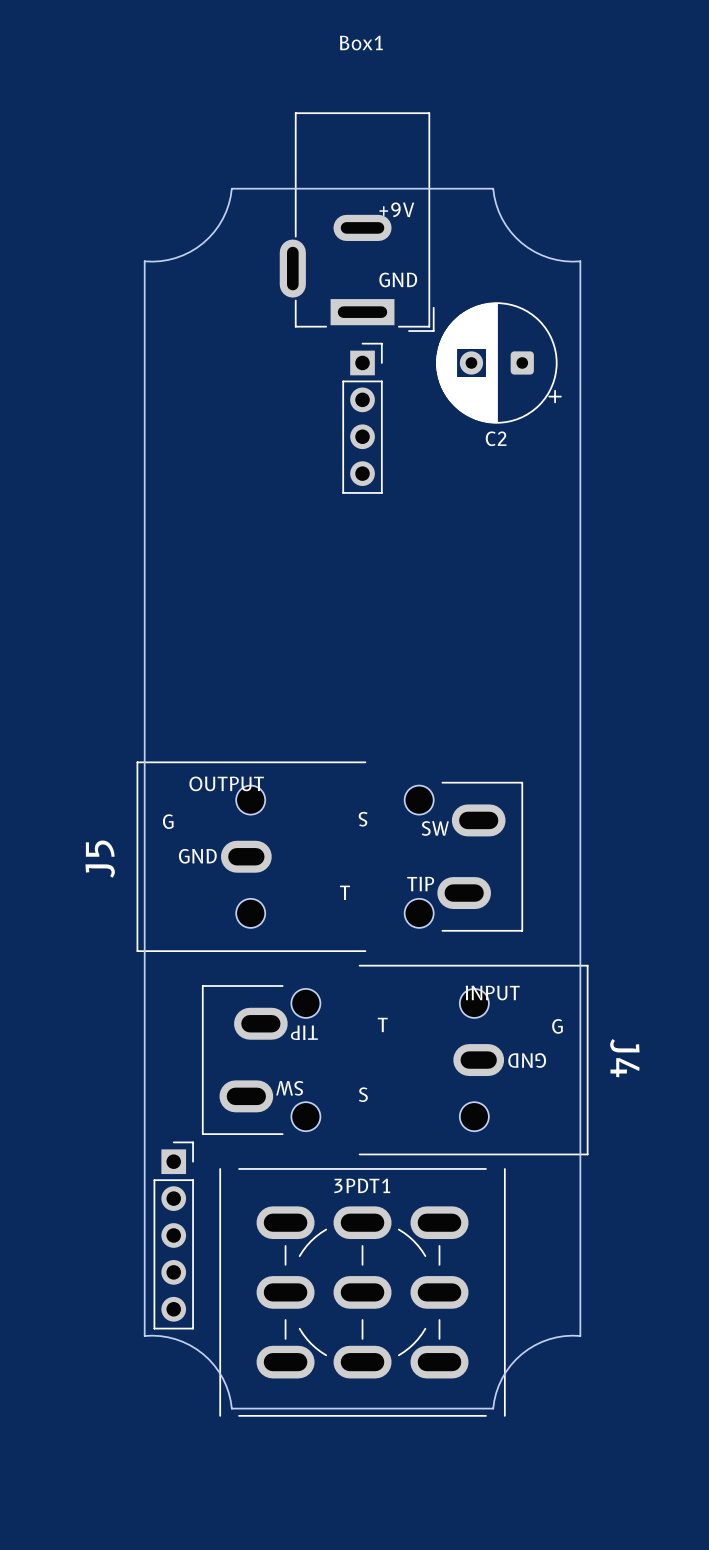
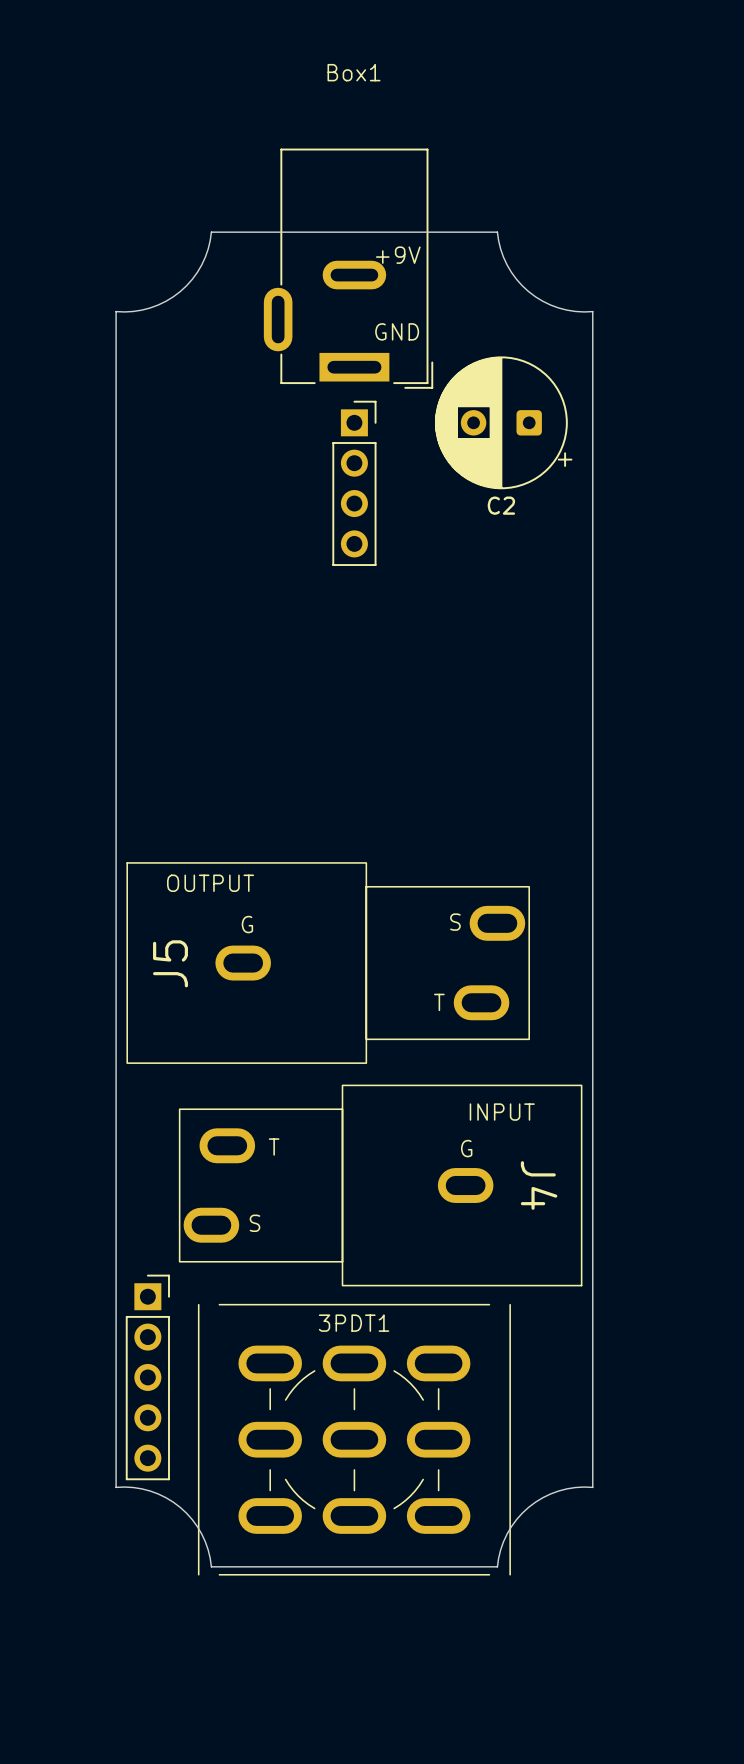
J5 footprint: [136, 761, 524, 952] -> [126, 862, 530, 1064]
J5 name position: J5 (100, 859) -> J5 (170, 963)
J4 footprint: [202, 964, 589, 1156] -> [178, 1084, 583, 1287]
J4 name position: J4 (624, 1058) -> J4 (539, 1185)

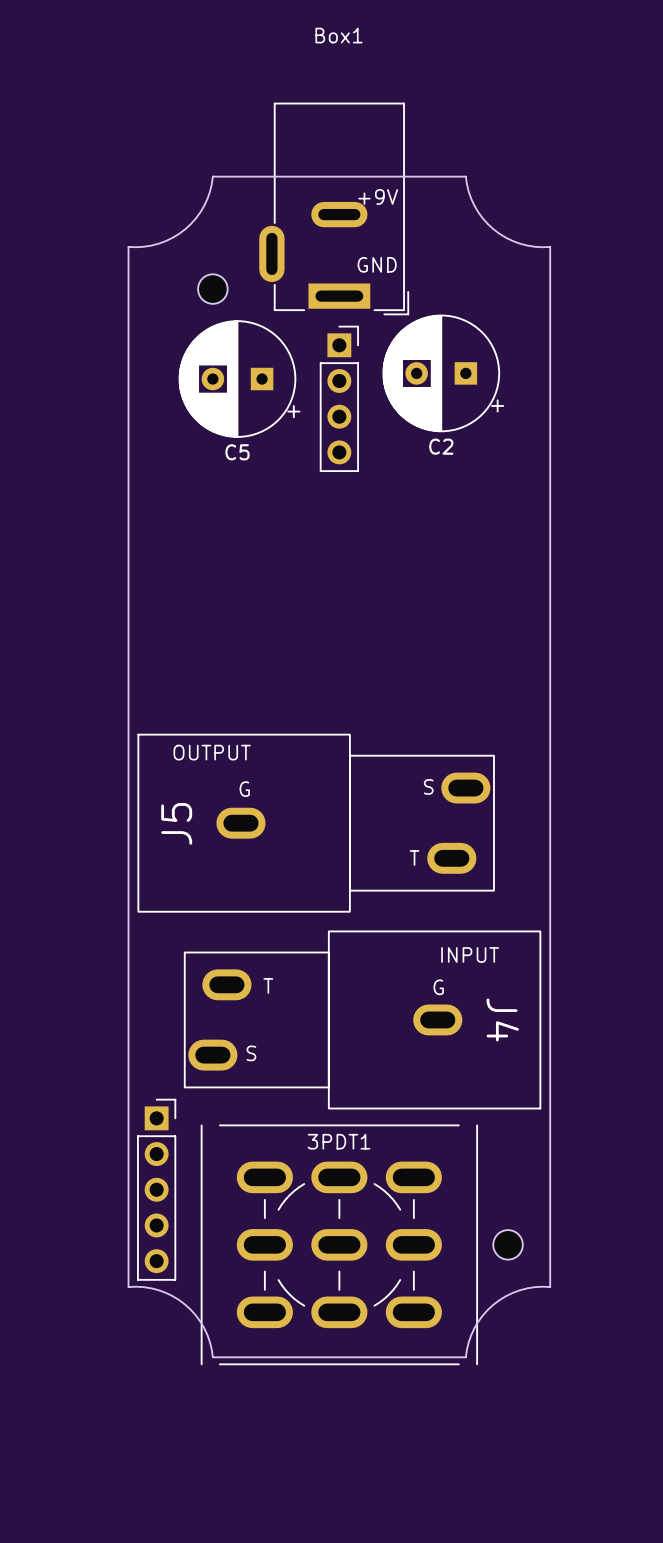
C2 footprint: [434, 356, 573, 490] -> [382, 314, 505, 433]
part: none -> (212, 289)
C5: none -> (239, 379)
part: none -> (508, 1244)

